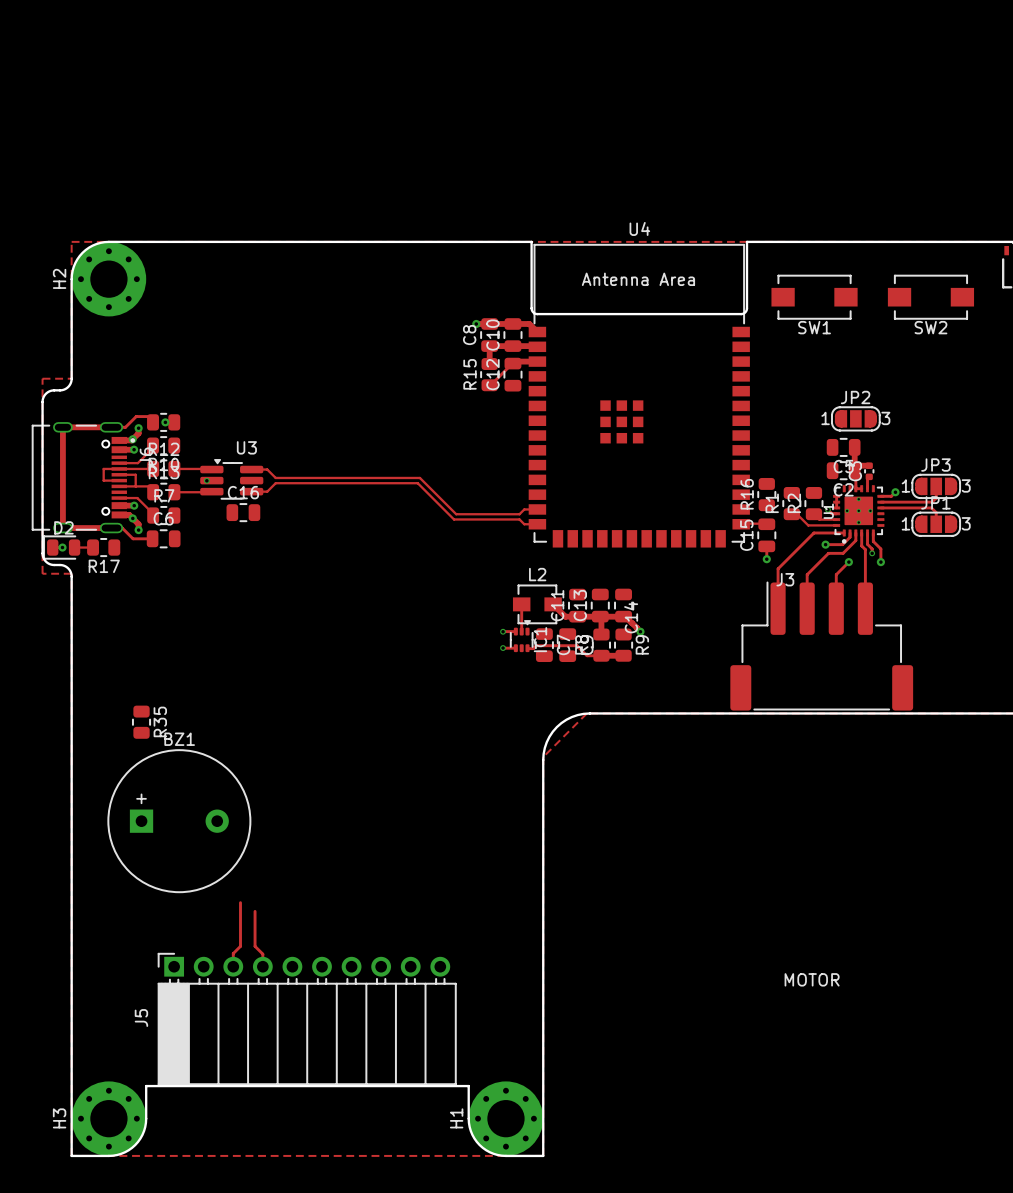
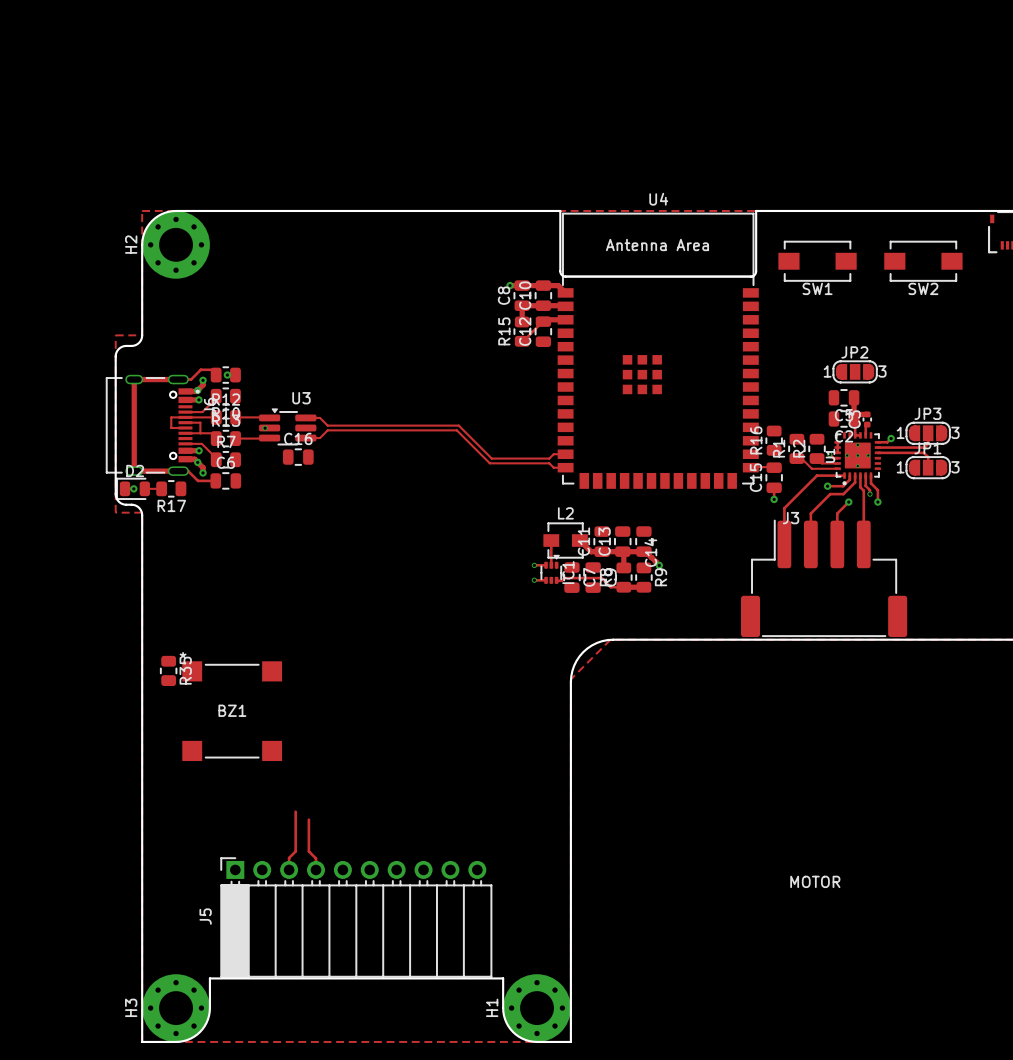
R35 position: (141, 722) -> (168, 670)
BZ1 name position: BZ1 (179, 739) -> BZ1 (232, 710)
BZ1 footprint: [107, 749, 252, 893] -> [182, 661, 283, 762]

